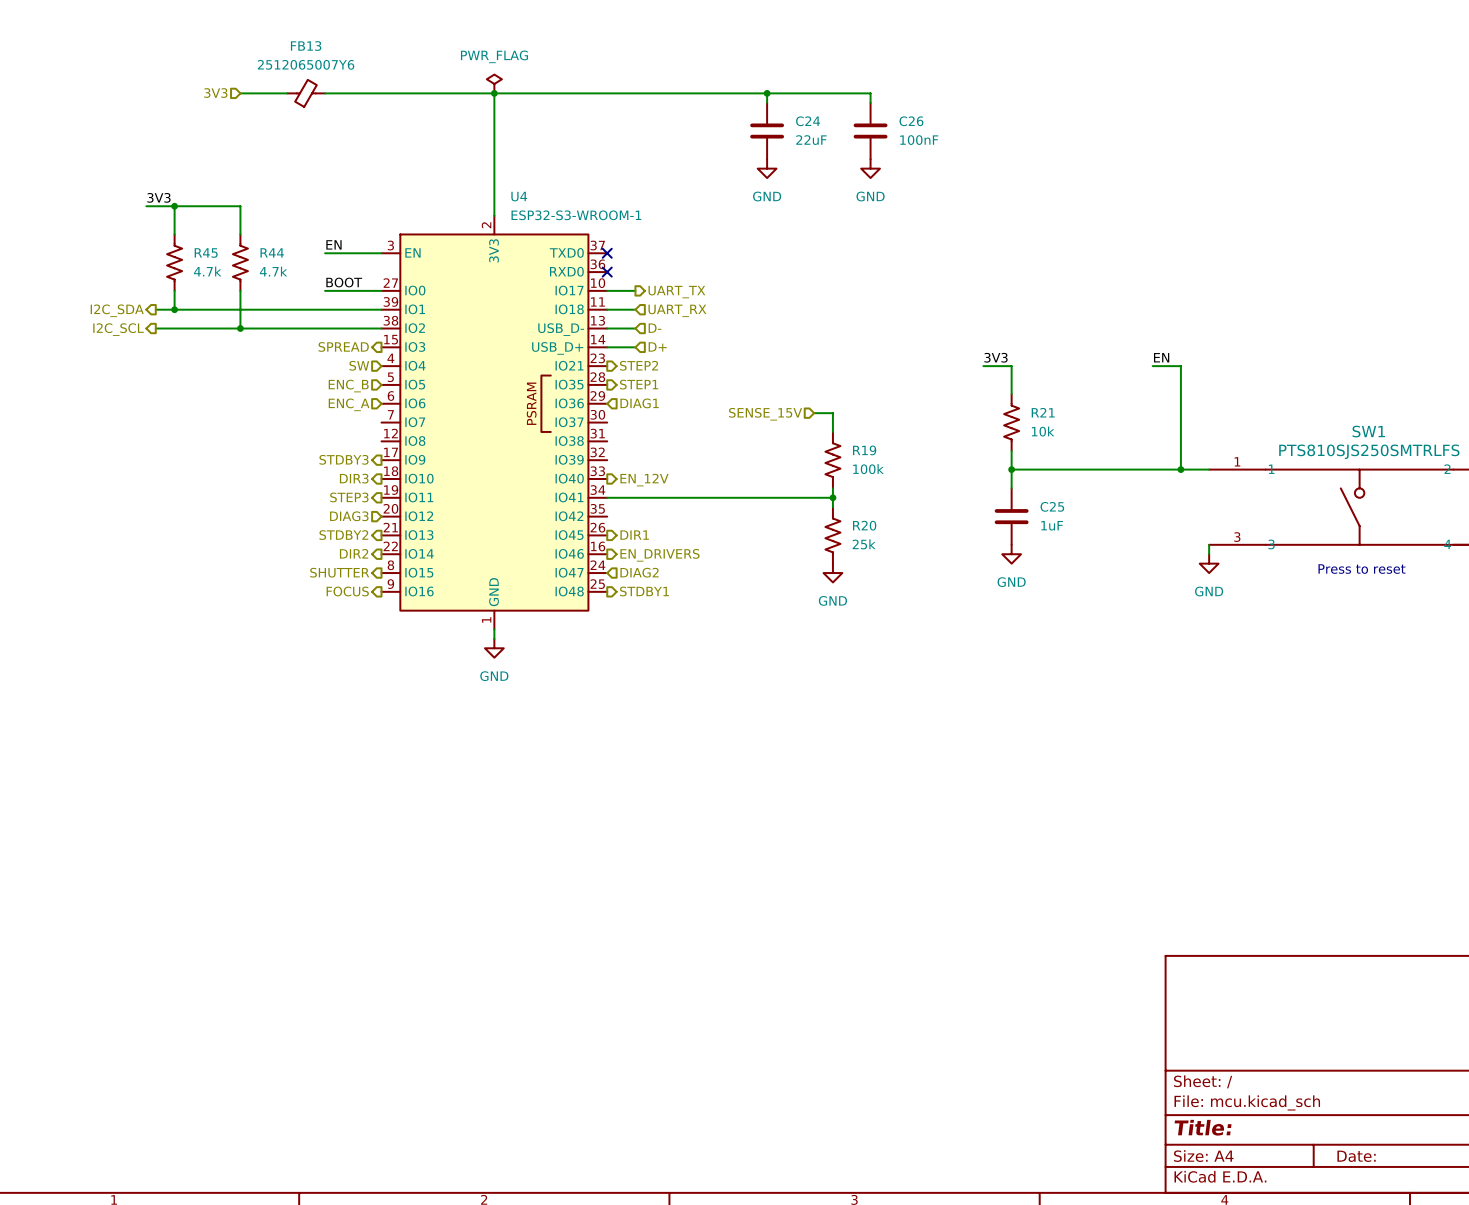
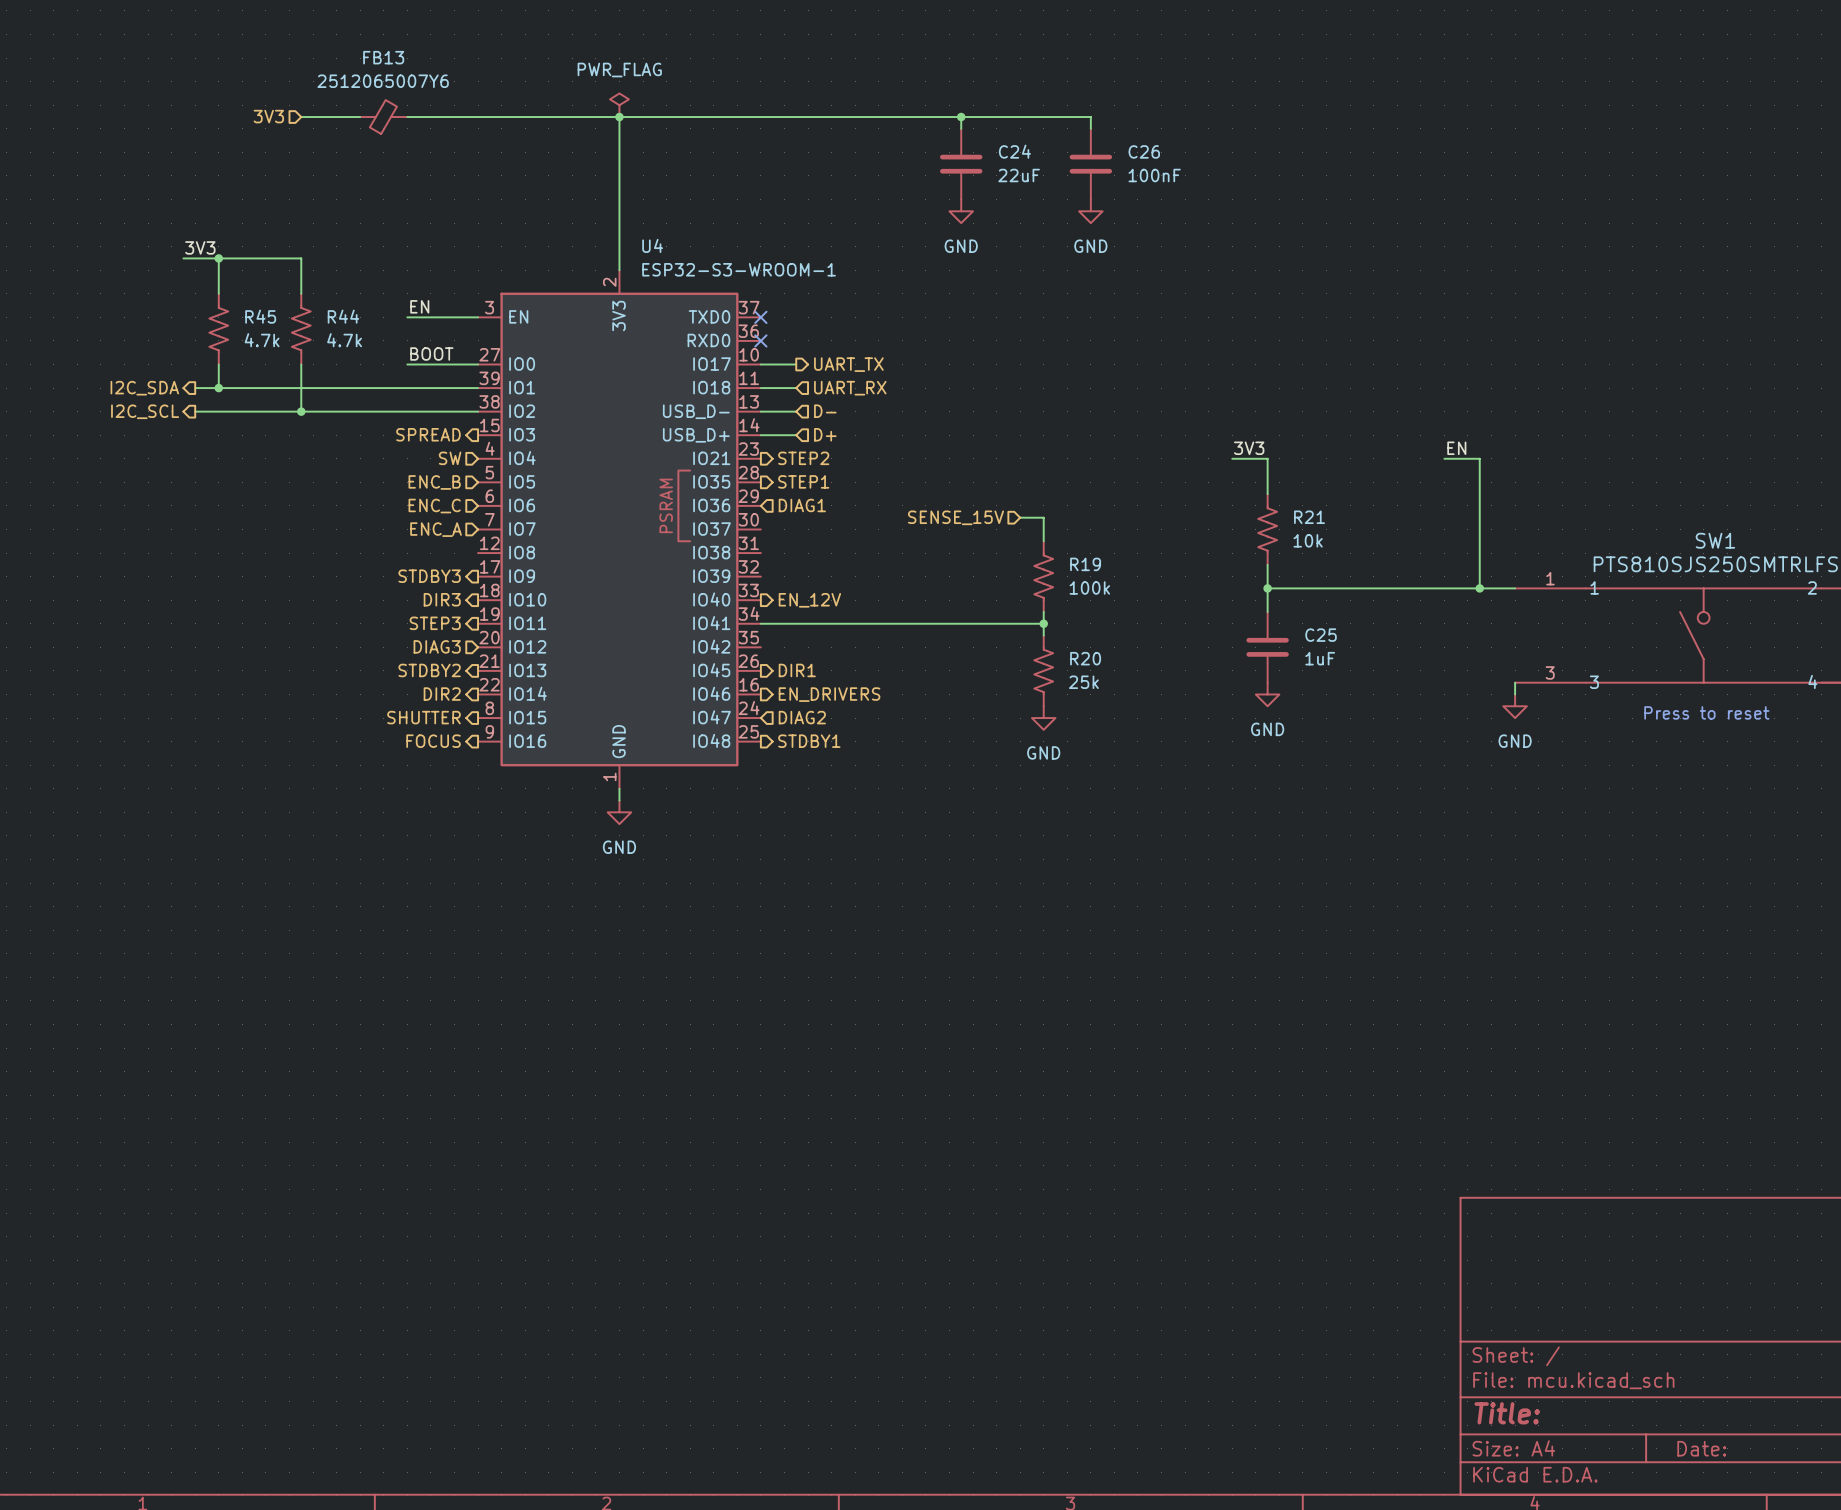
hierarchical label: ENC_A (349, 404) -> ENC_C (434, 506)
hierarchical label: none -> ENC_A (436, 529)

